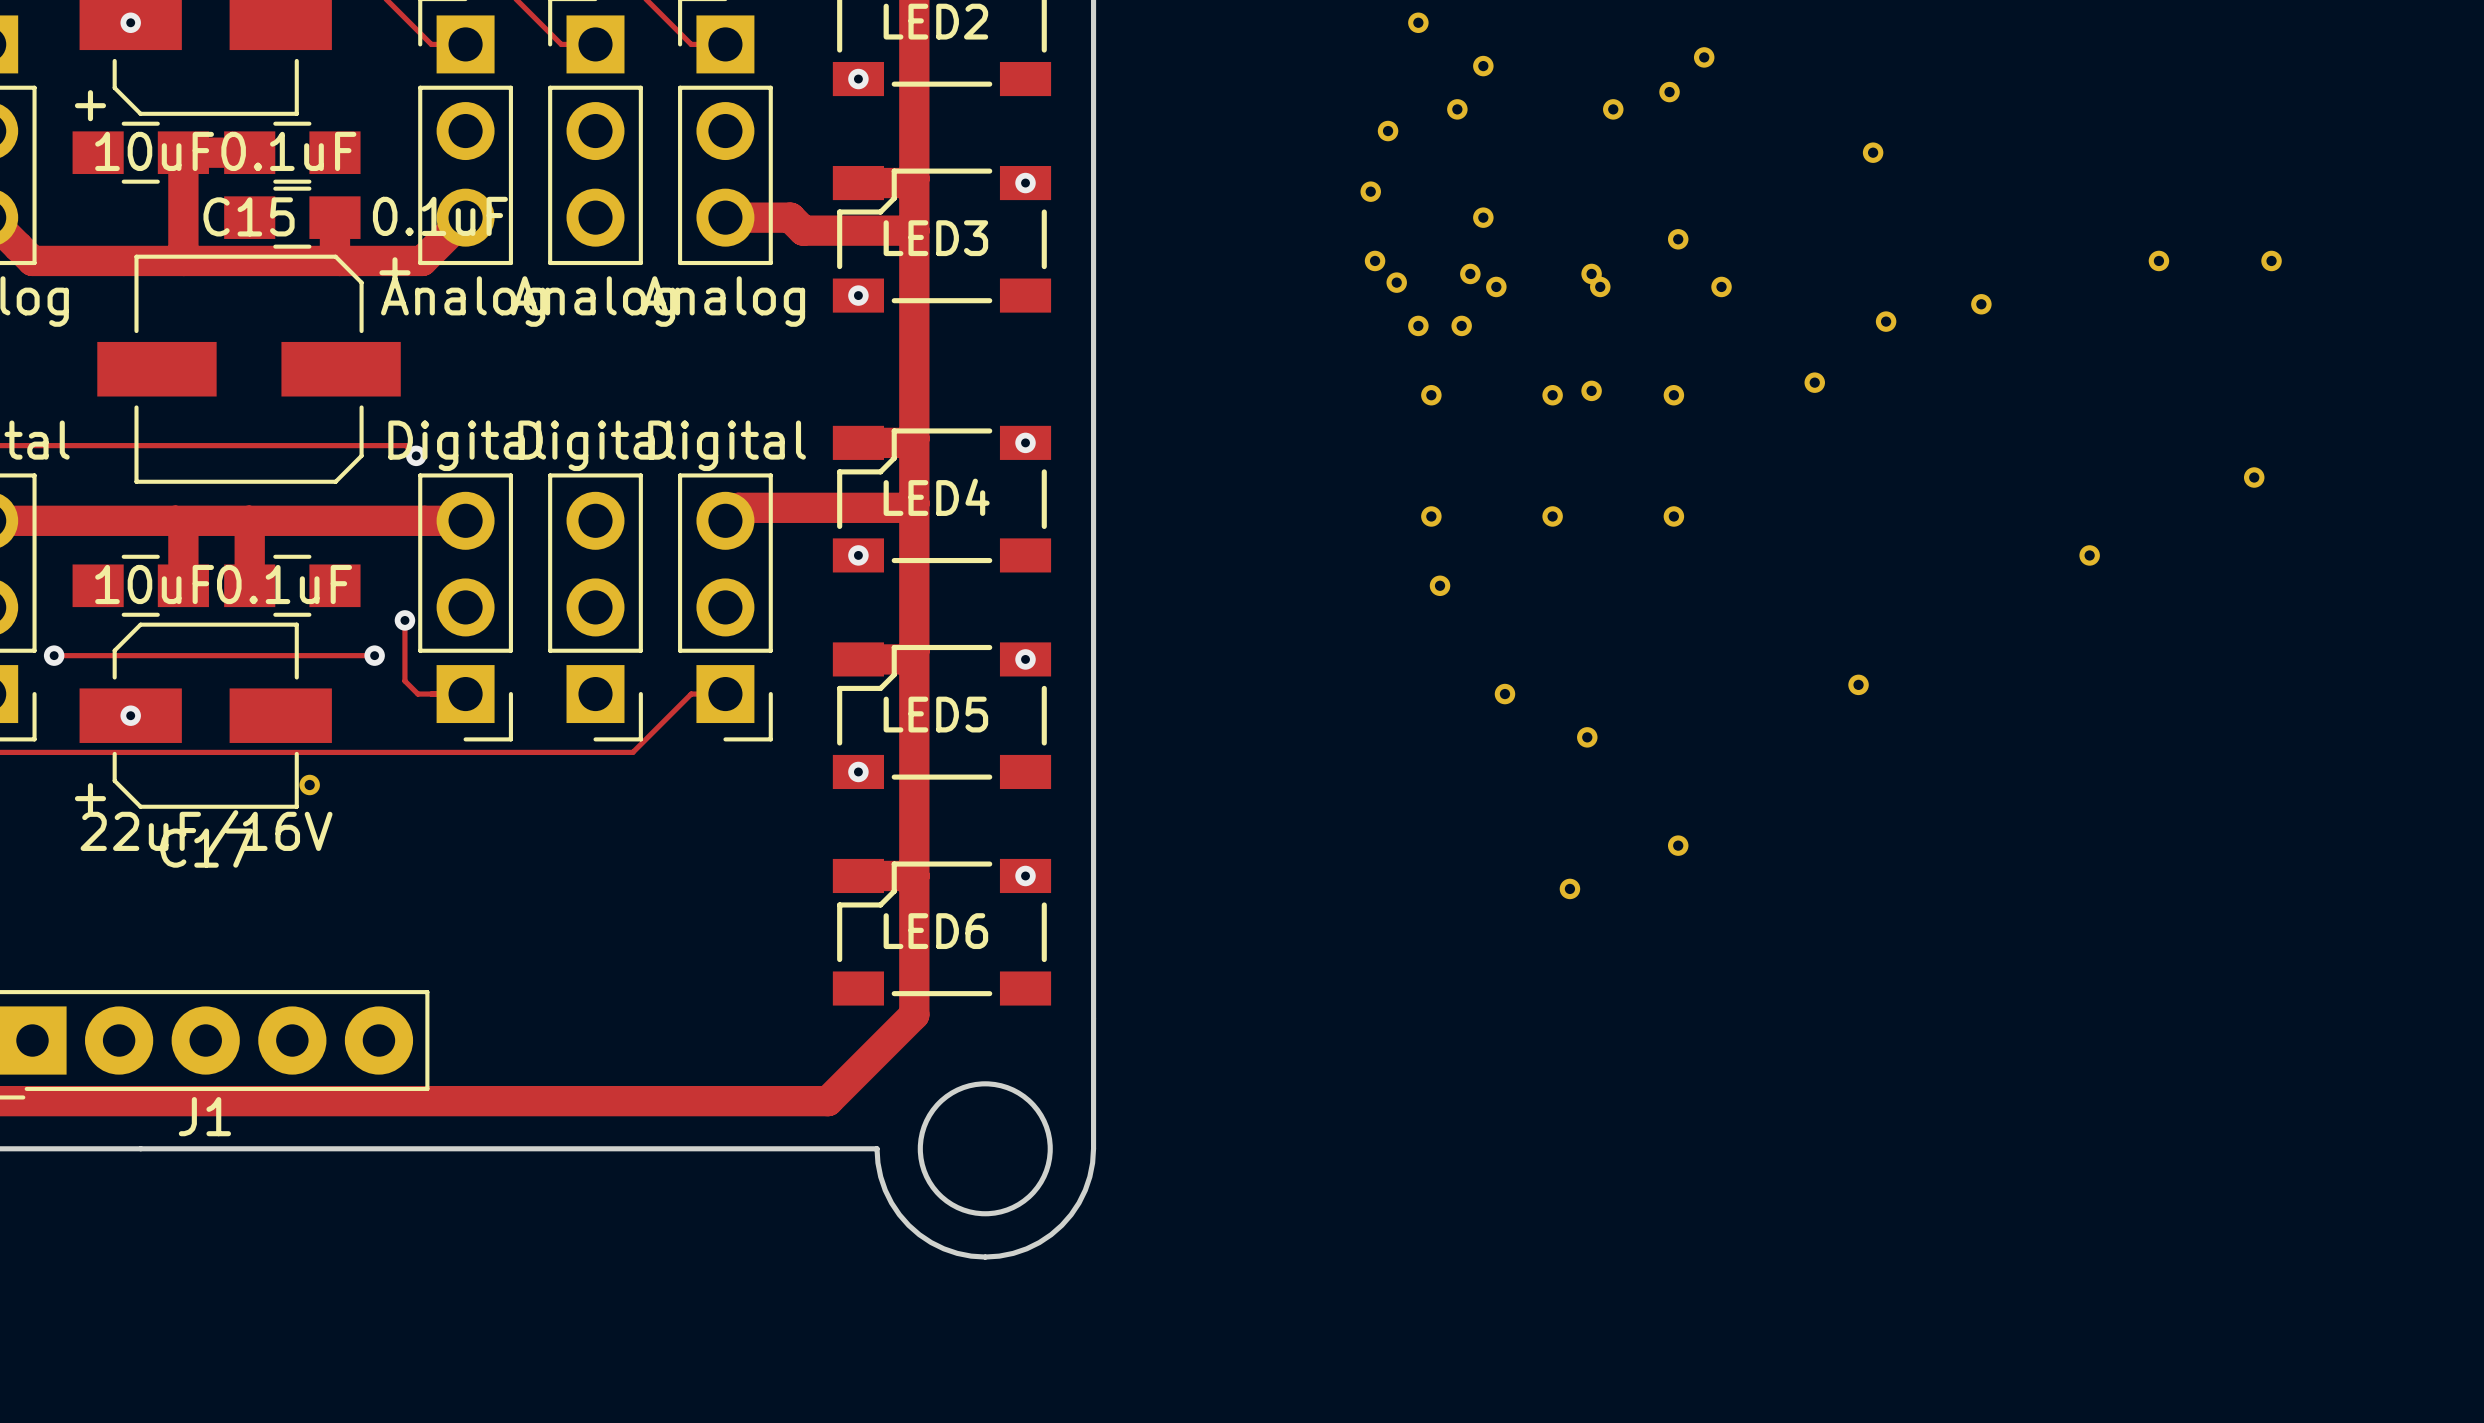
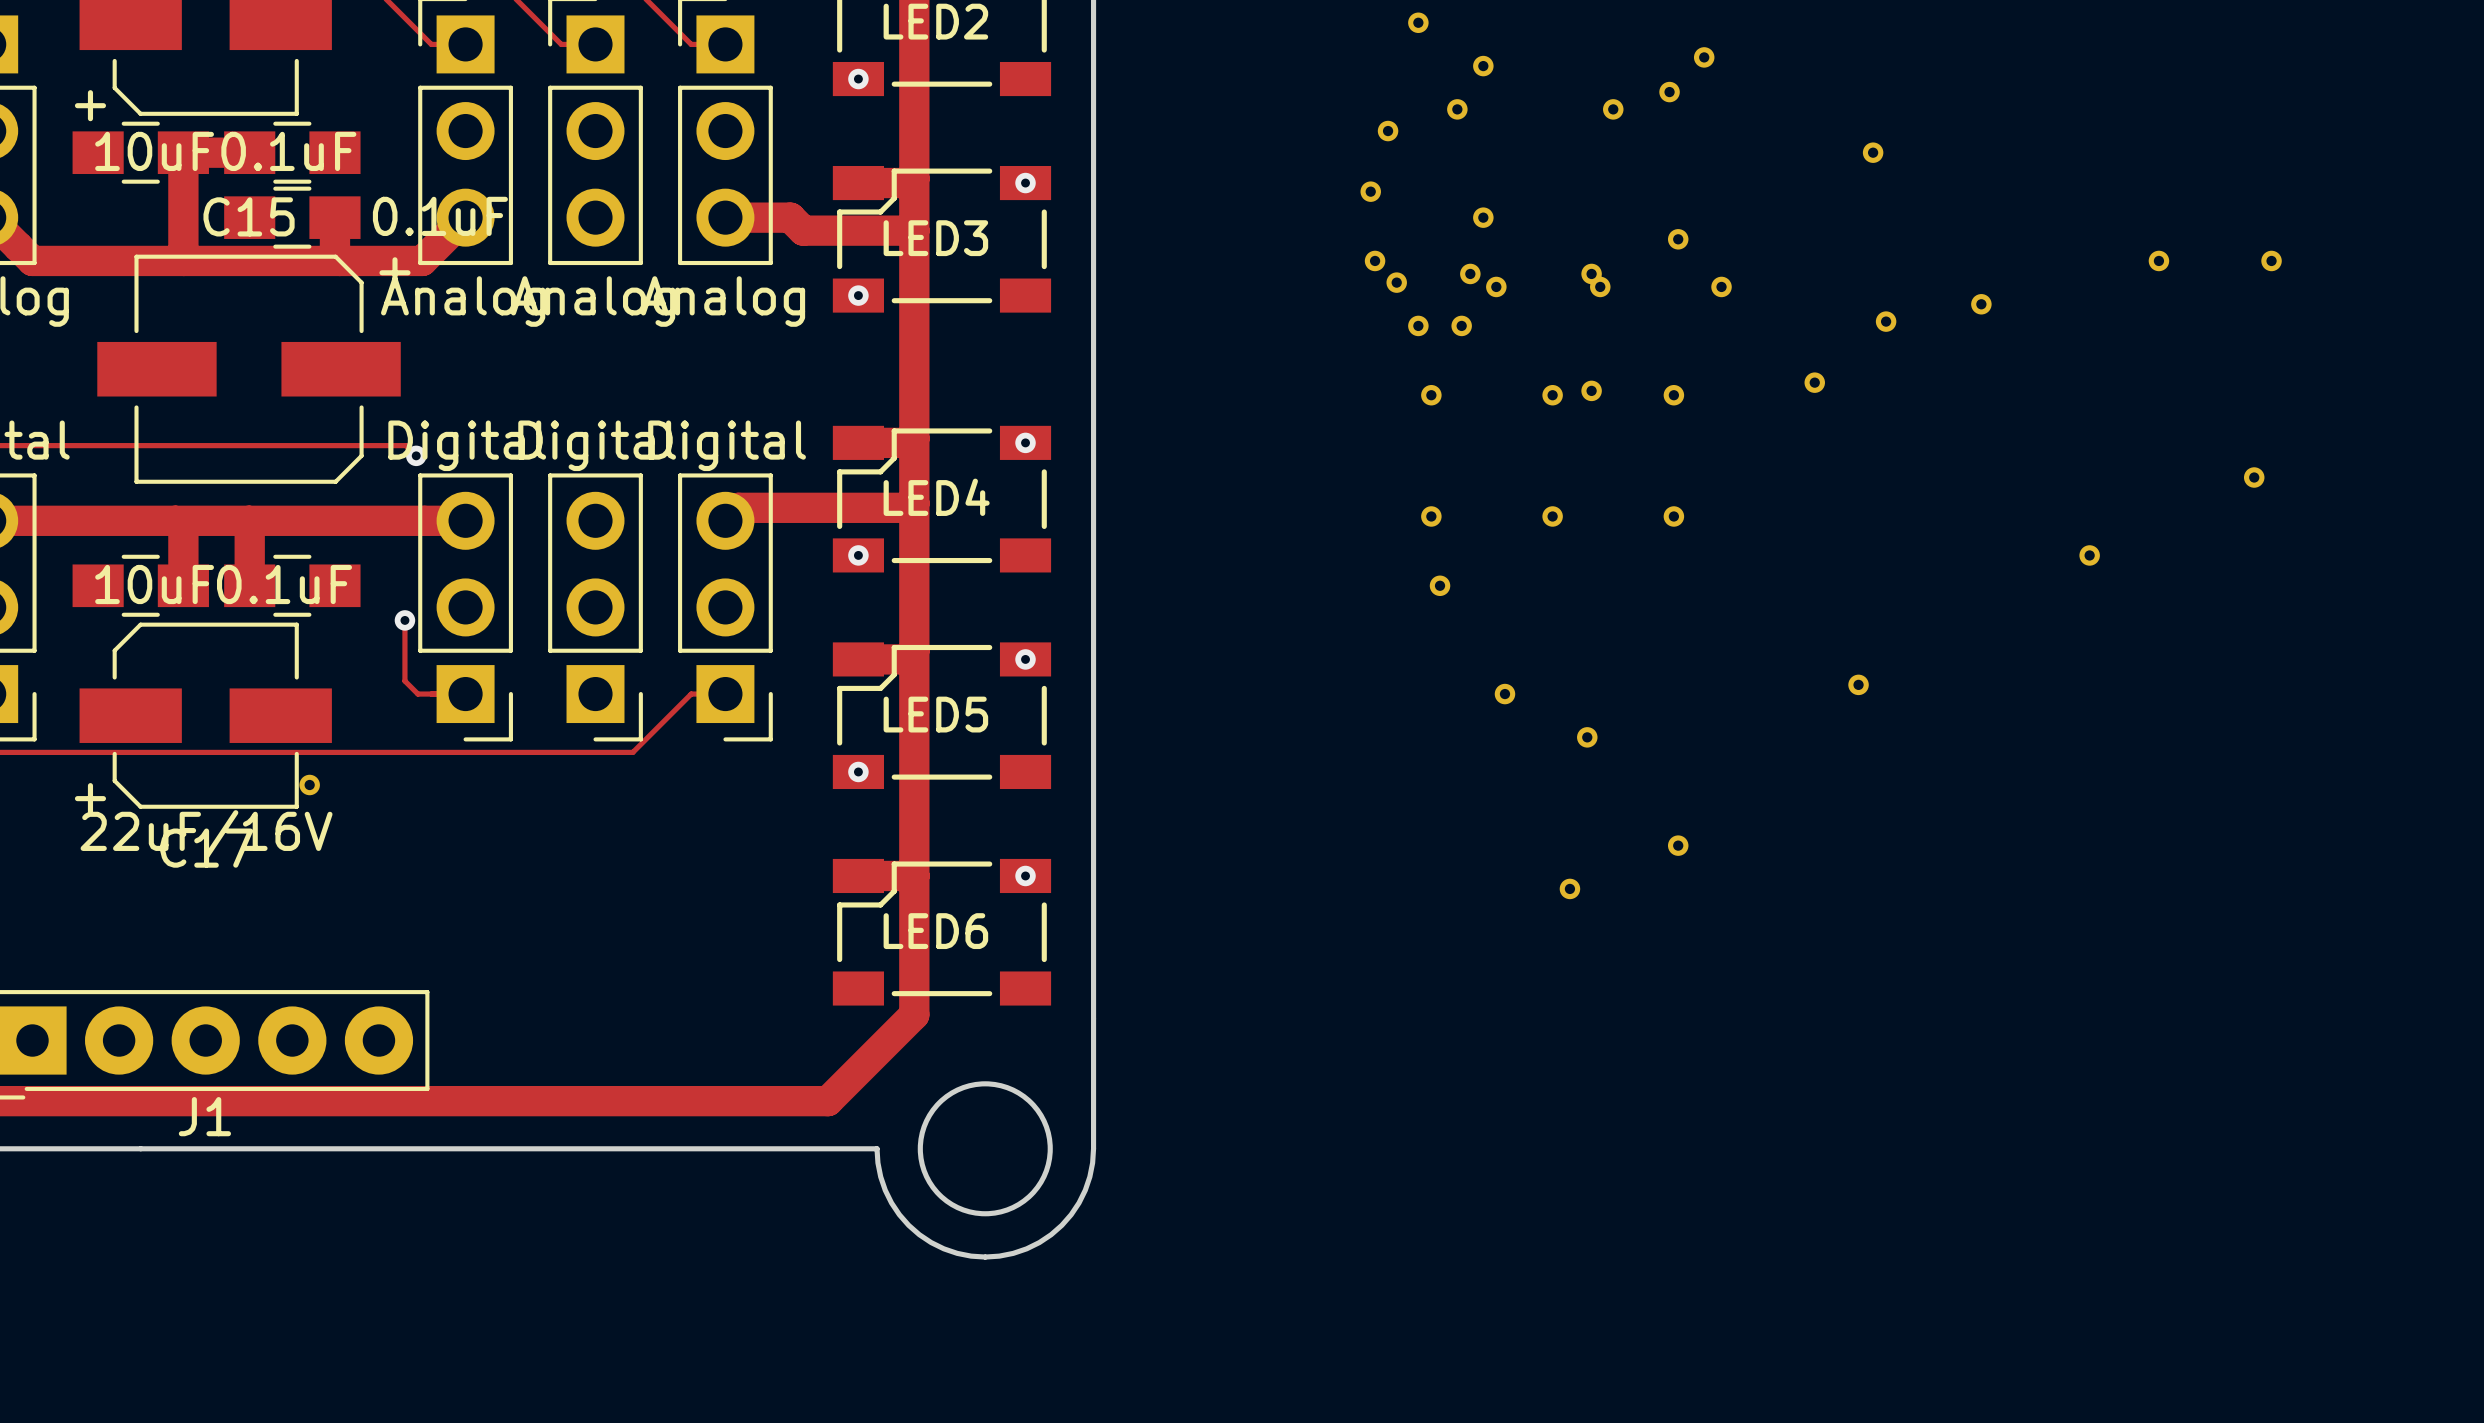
via: (130, 22) -> none
track: (54, 655) (374, 655) -> none
via: (54, 655) -> none
via: (374, 655) -> none
via: (130, 715) -> none

